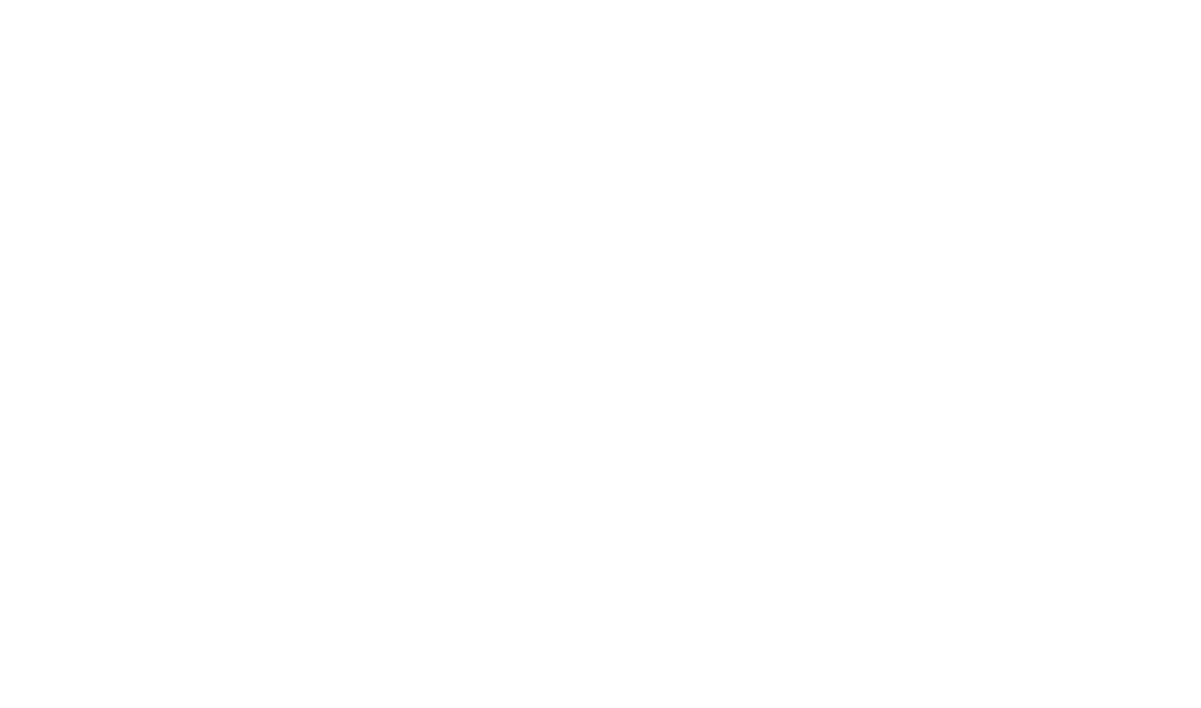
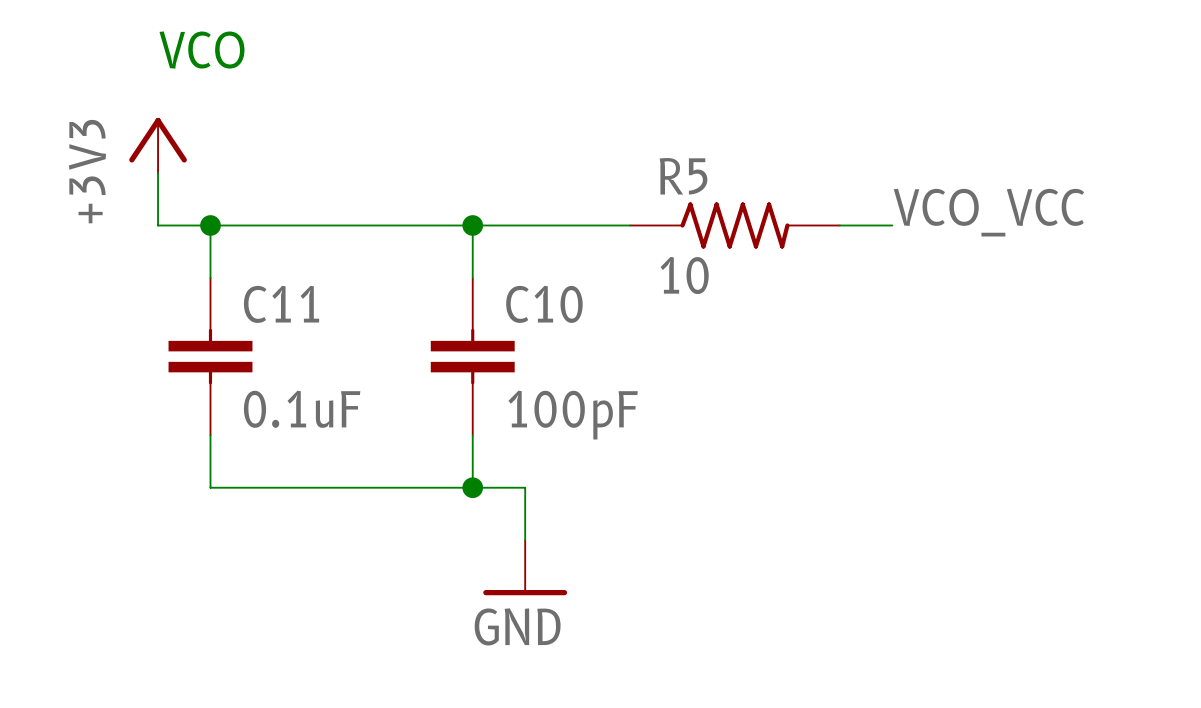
text: none -> VCO (201, 50)
power symbol: none -> +3V3 (158, 145)
wire: none -> (158, 173) (158, 225) (630, 225)
label: none -> VCO_VCC (988, 212)
wire: none -> (210, 225) (210, 277)
junction: none -> (210, 225)
wire: none -> (472, 225) (472, 277)
junction: none -> (472, 225)
R5: none -> 10 (734, 225)
wire: none -> (839, 225) (892, 225)
C11: none -> 0.1uF (210, 356)
C10: none -> 100pF (472, 356)
wire: none -> (210, 435) (210, 487) (525, 487) (525, 540)
wire: none -> (472, 435) (472, 487)
junction: none -> (472, 487)
power symbol: none -> GND (525, 567)

